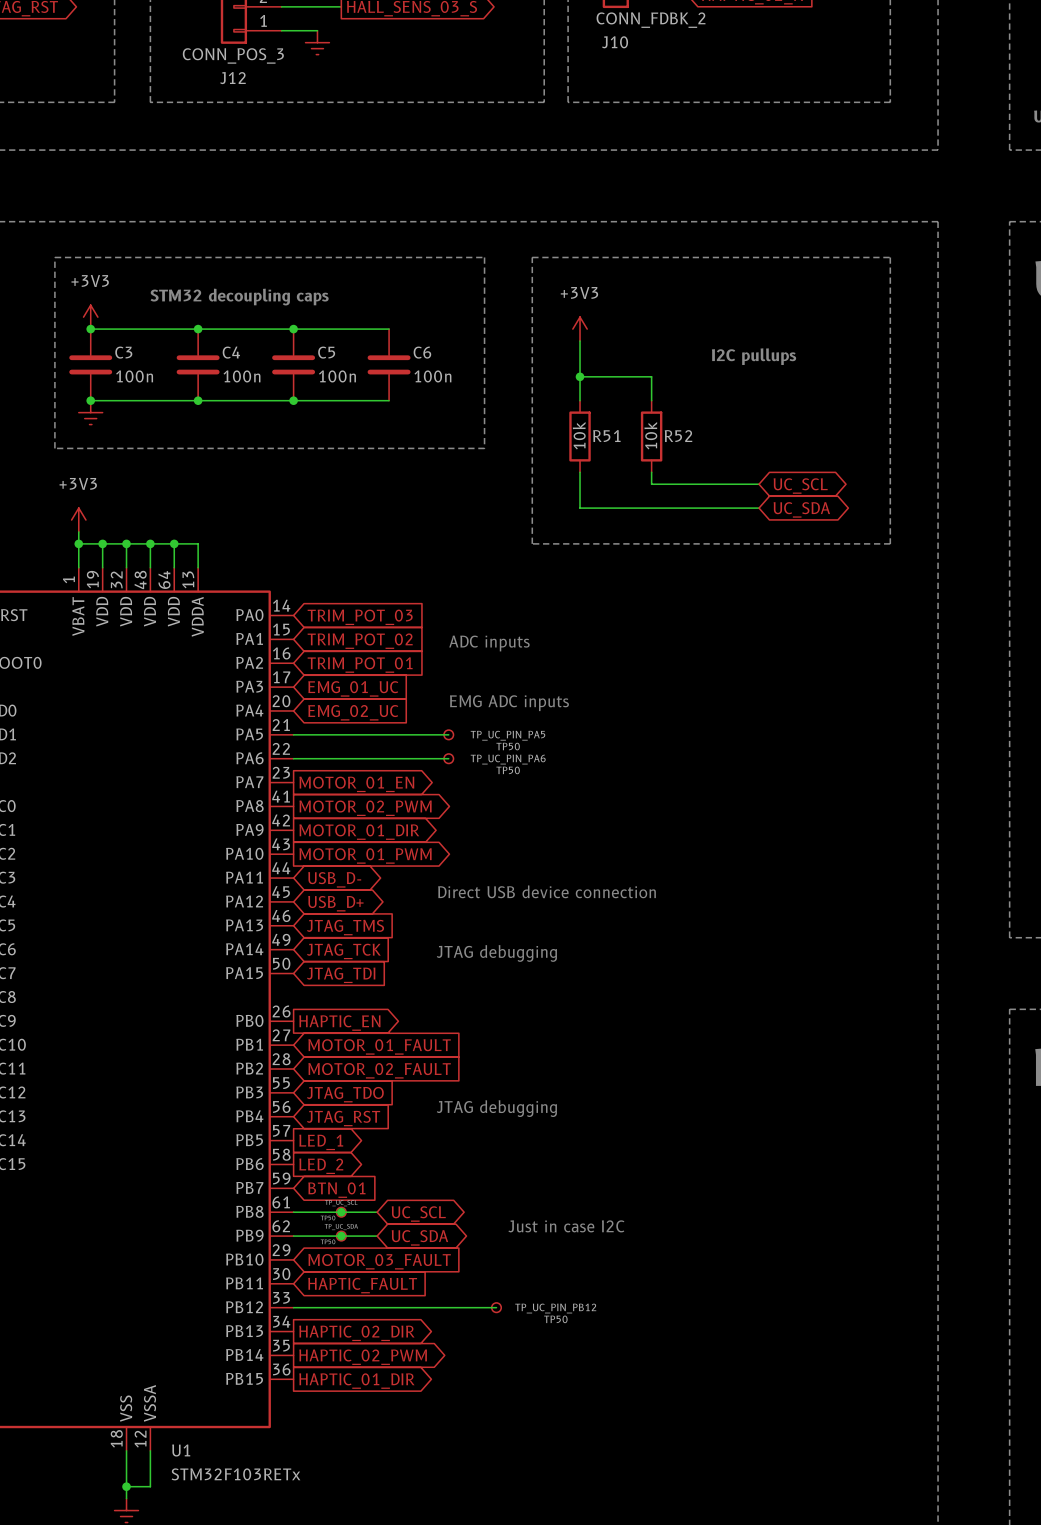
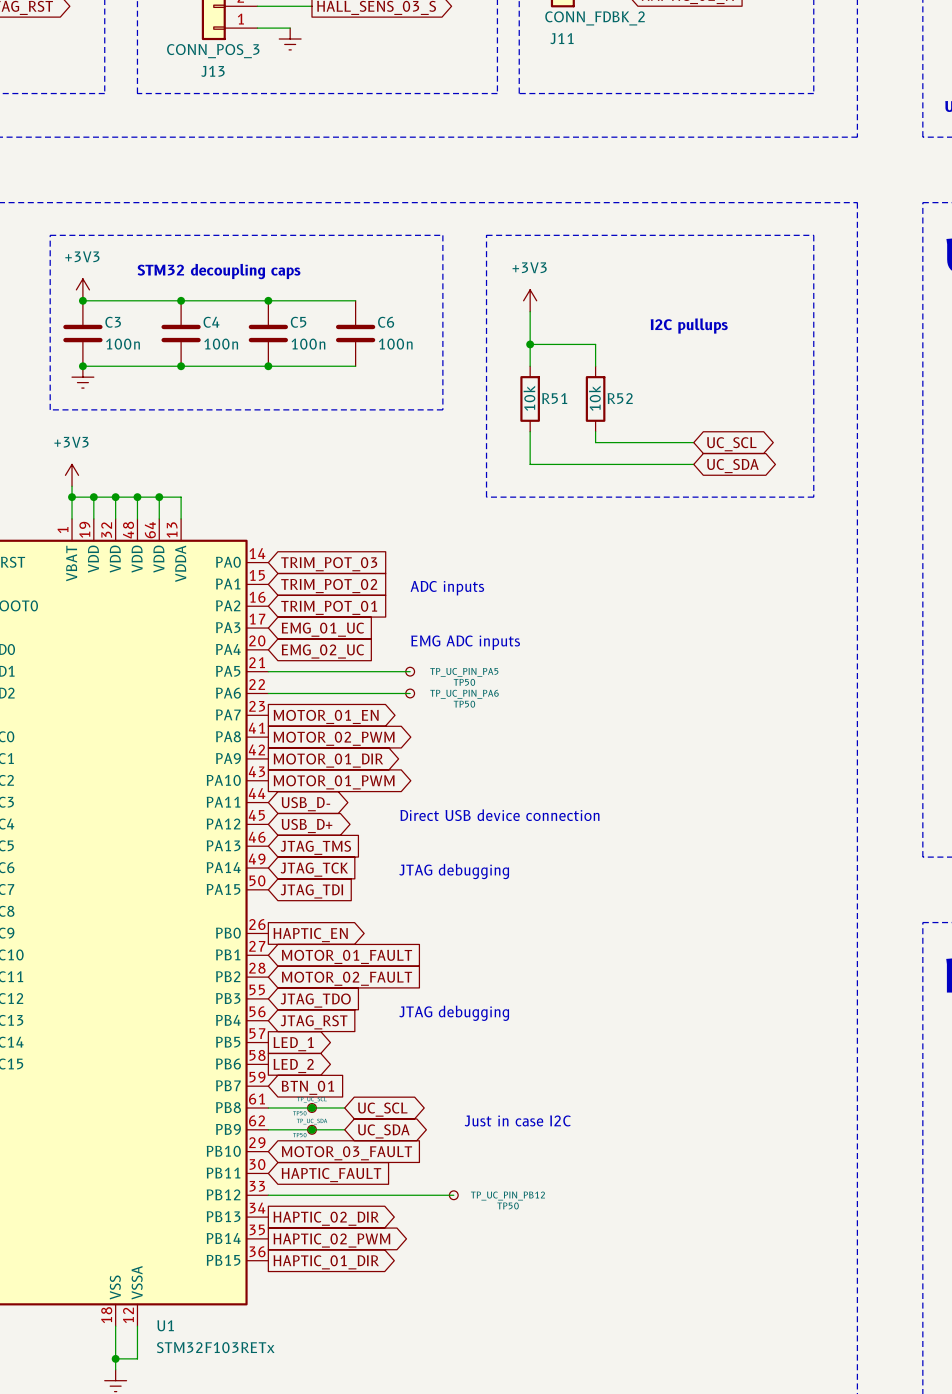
J10 name: J10 (615, 42) -> J11 (561, 38)
J12 name: J12 (232, 78) -> J13 (212, 71)

